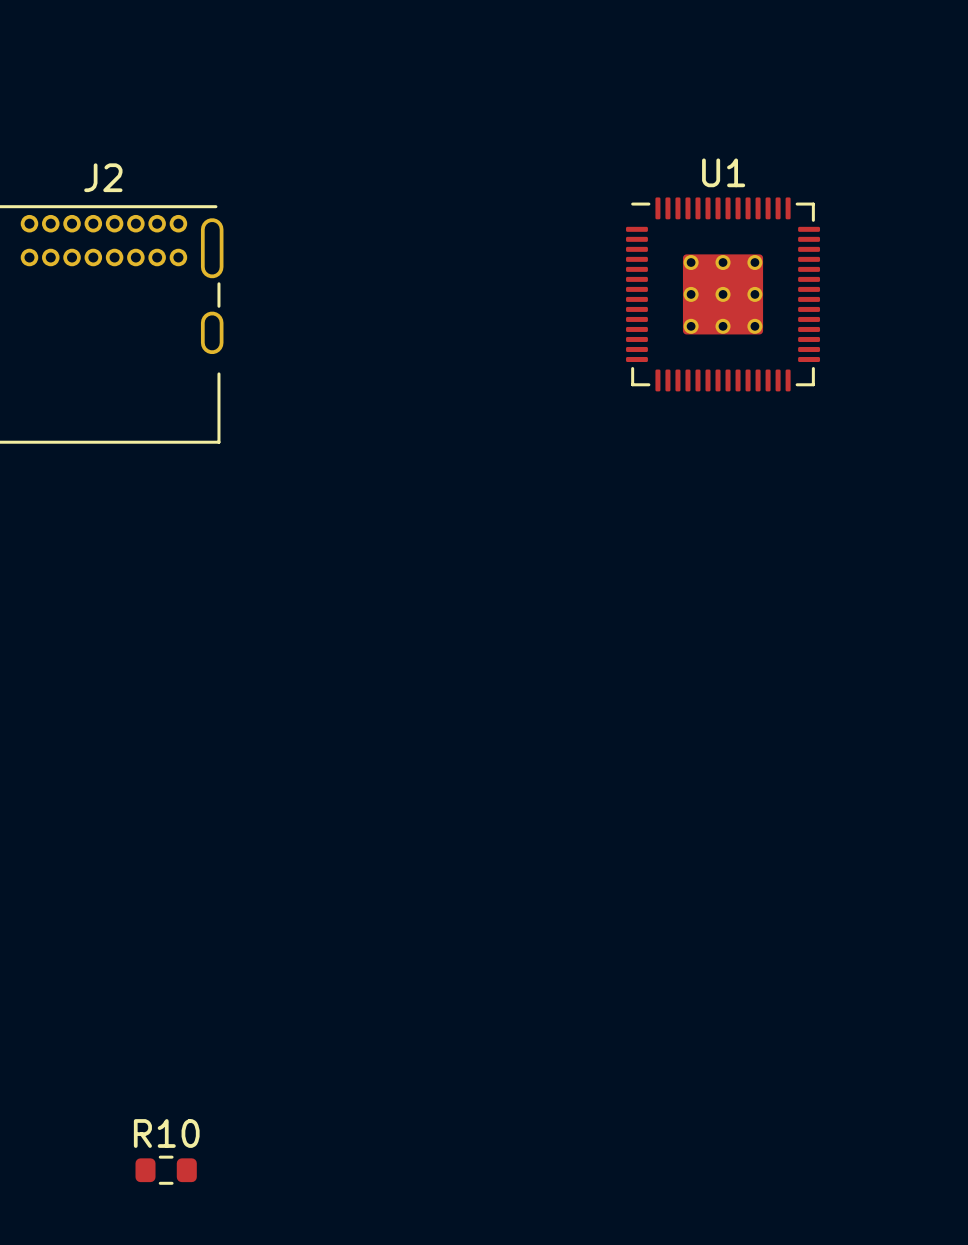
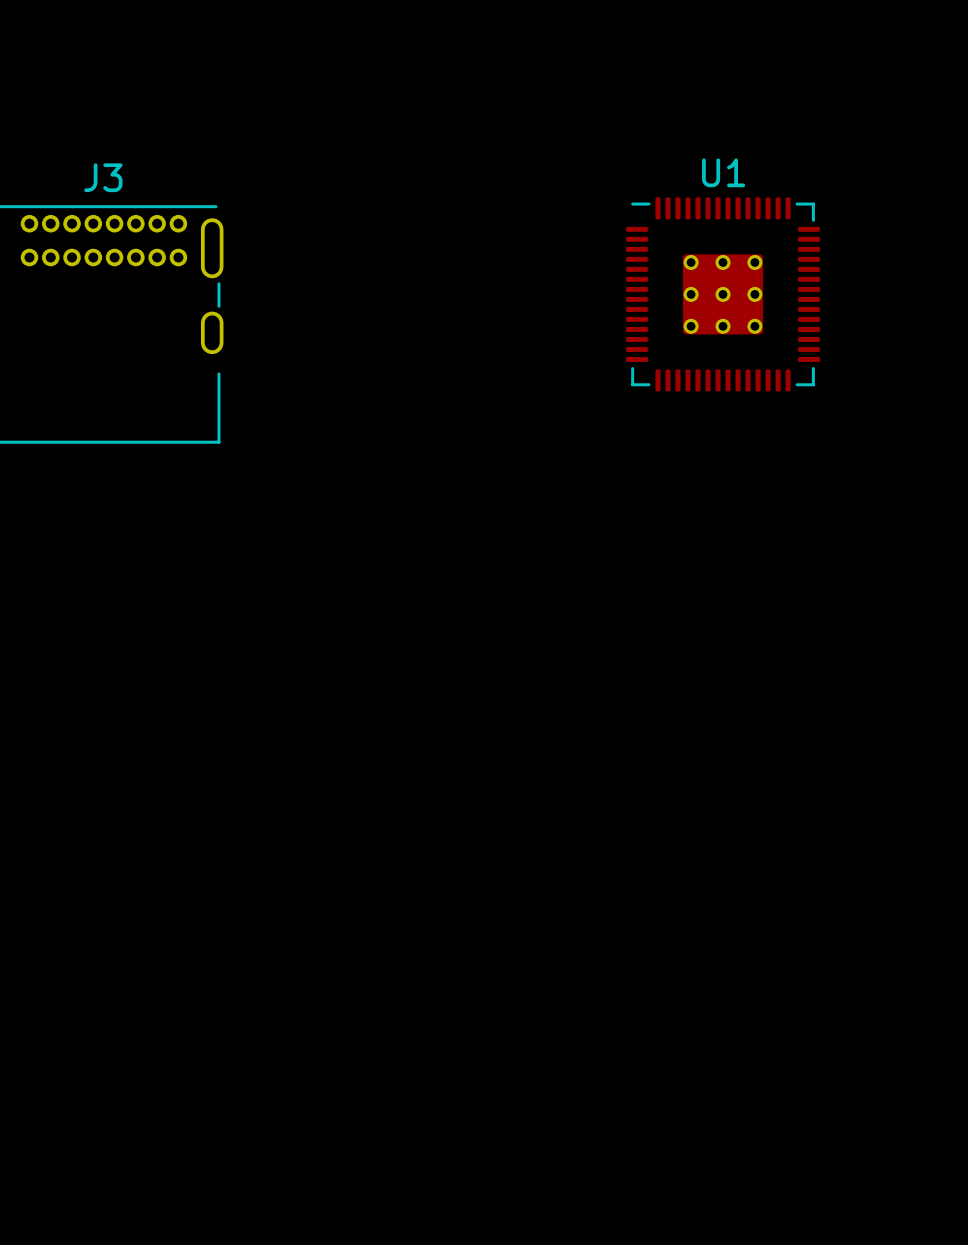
J2 name: J2 (103, 177) -> J3 (103, 177)
R10: (166, 1170) -> none

